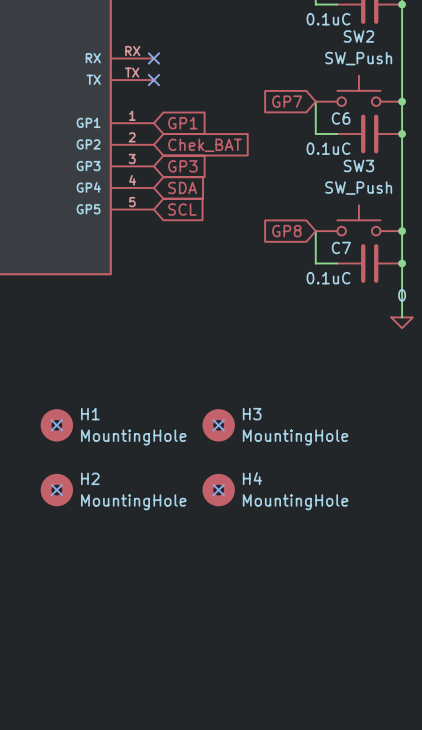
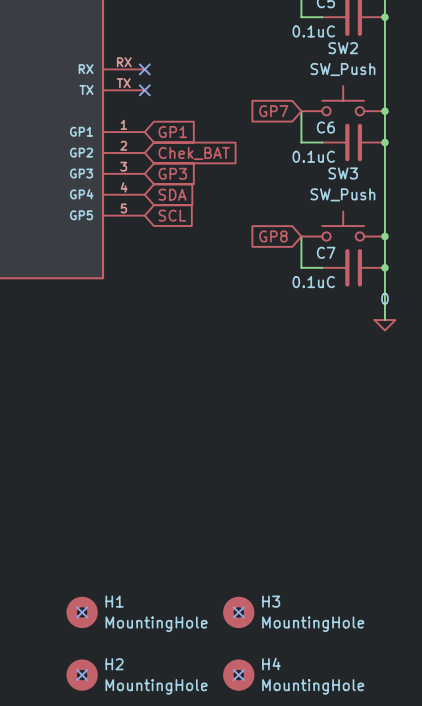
no-connect mark: (56, 425) -> none
H1 position: (56, 425) -> (82, 612)
no-connect mark: (218, 425) -> none
H3 position: (218, 425) -> (238, 612)
no-connect mark: (56, 490) -> none
H2 position: (56, 490) -> (82, 675)
no-connect mark: (218, 490) -> none
H4 position: (218, 490) -> (238, 675)
no-connect mark: none -> (82, 612)
no-connect mark: none -> (238, 612)
no-connect mark: none -> (82, 675)
no-connect mark: none -> (238, 675)

